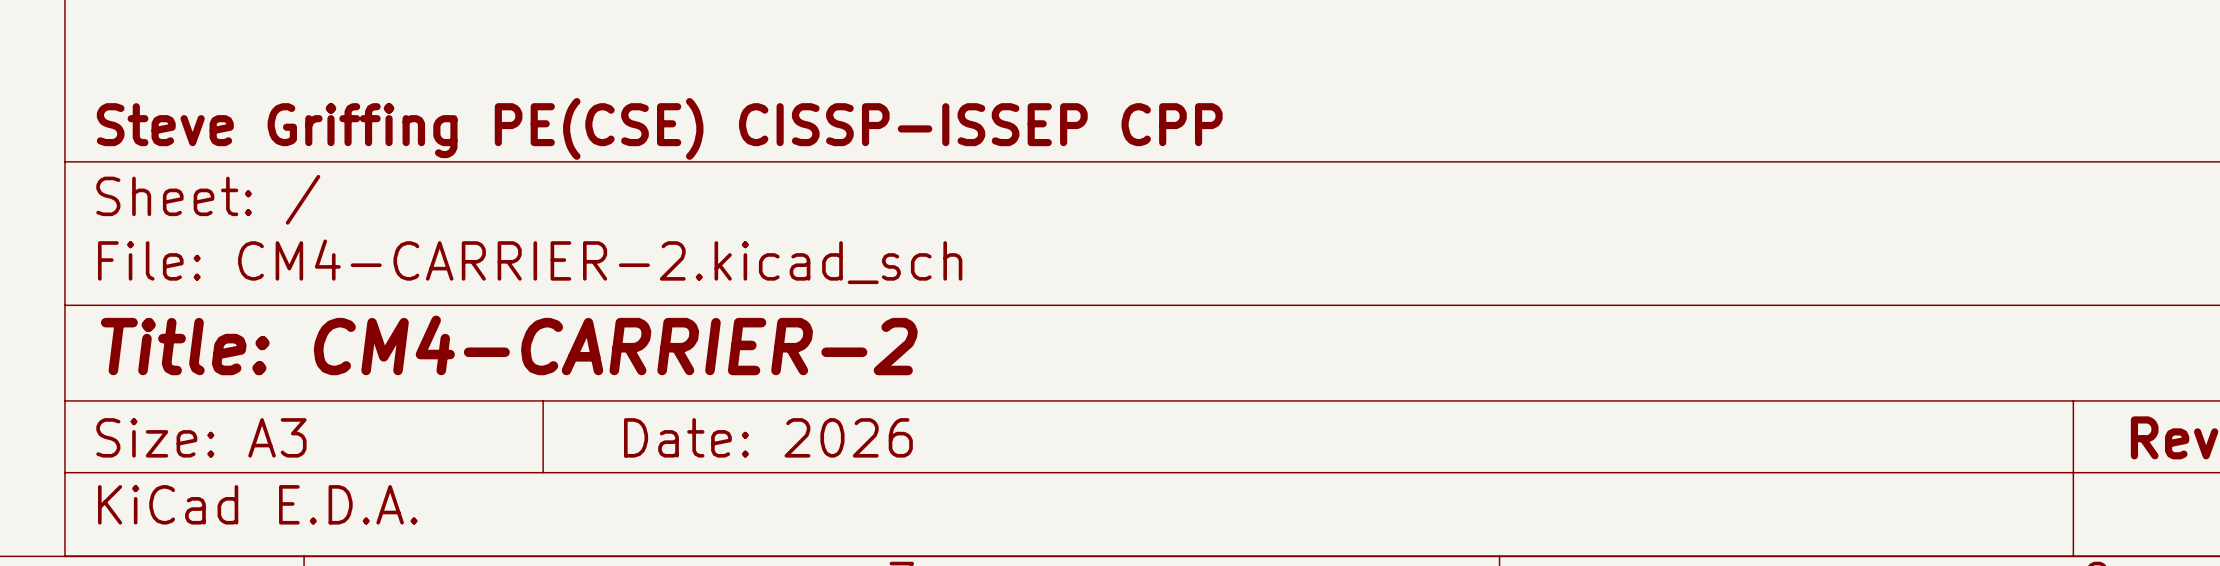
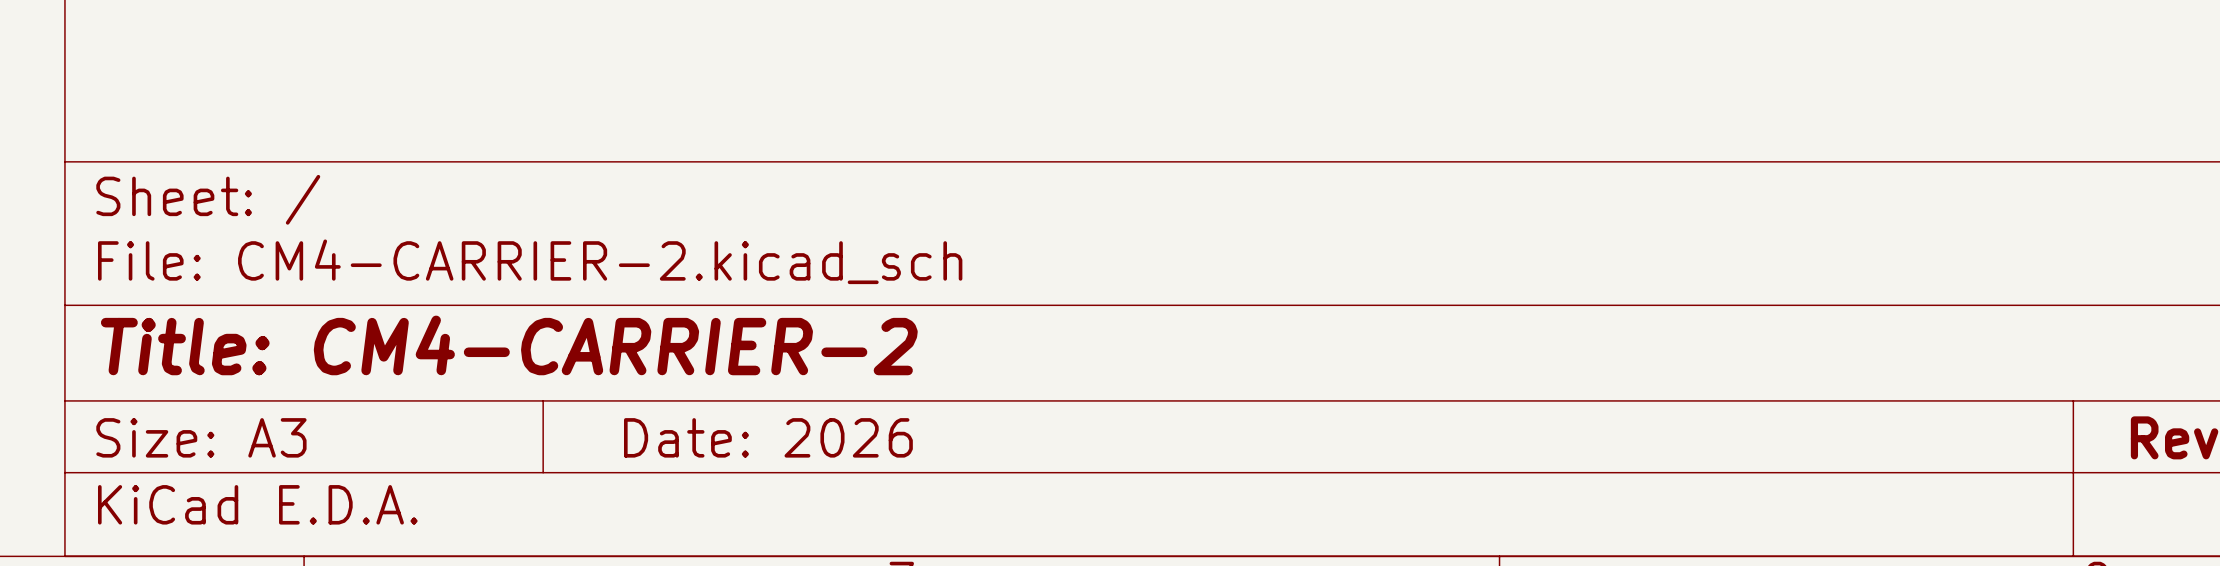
title block: Steve Griffing PE(CSE) CISSP-ISSEP CPP (659, 128) -> none

